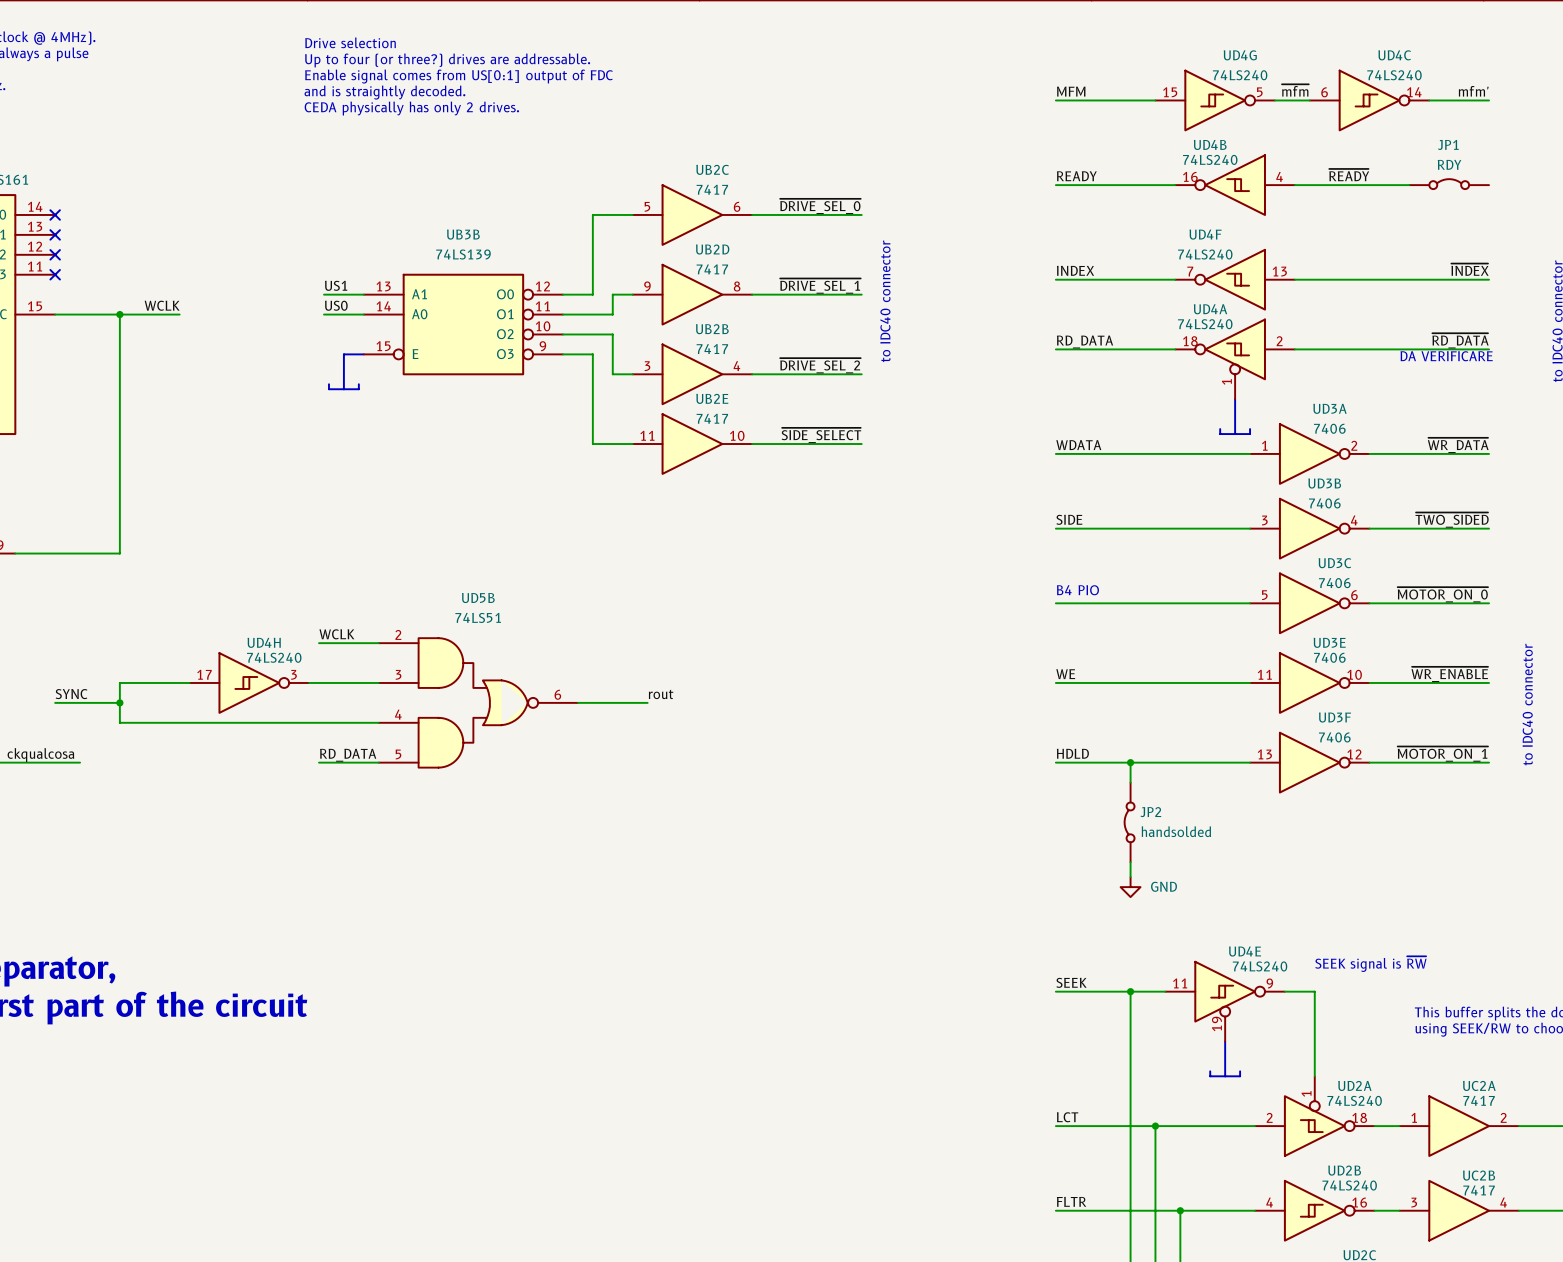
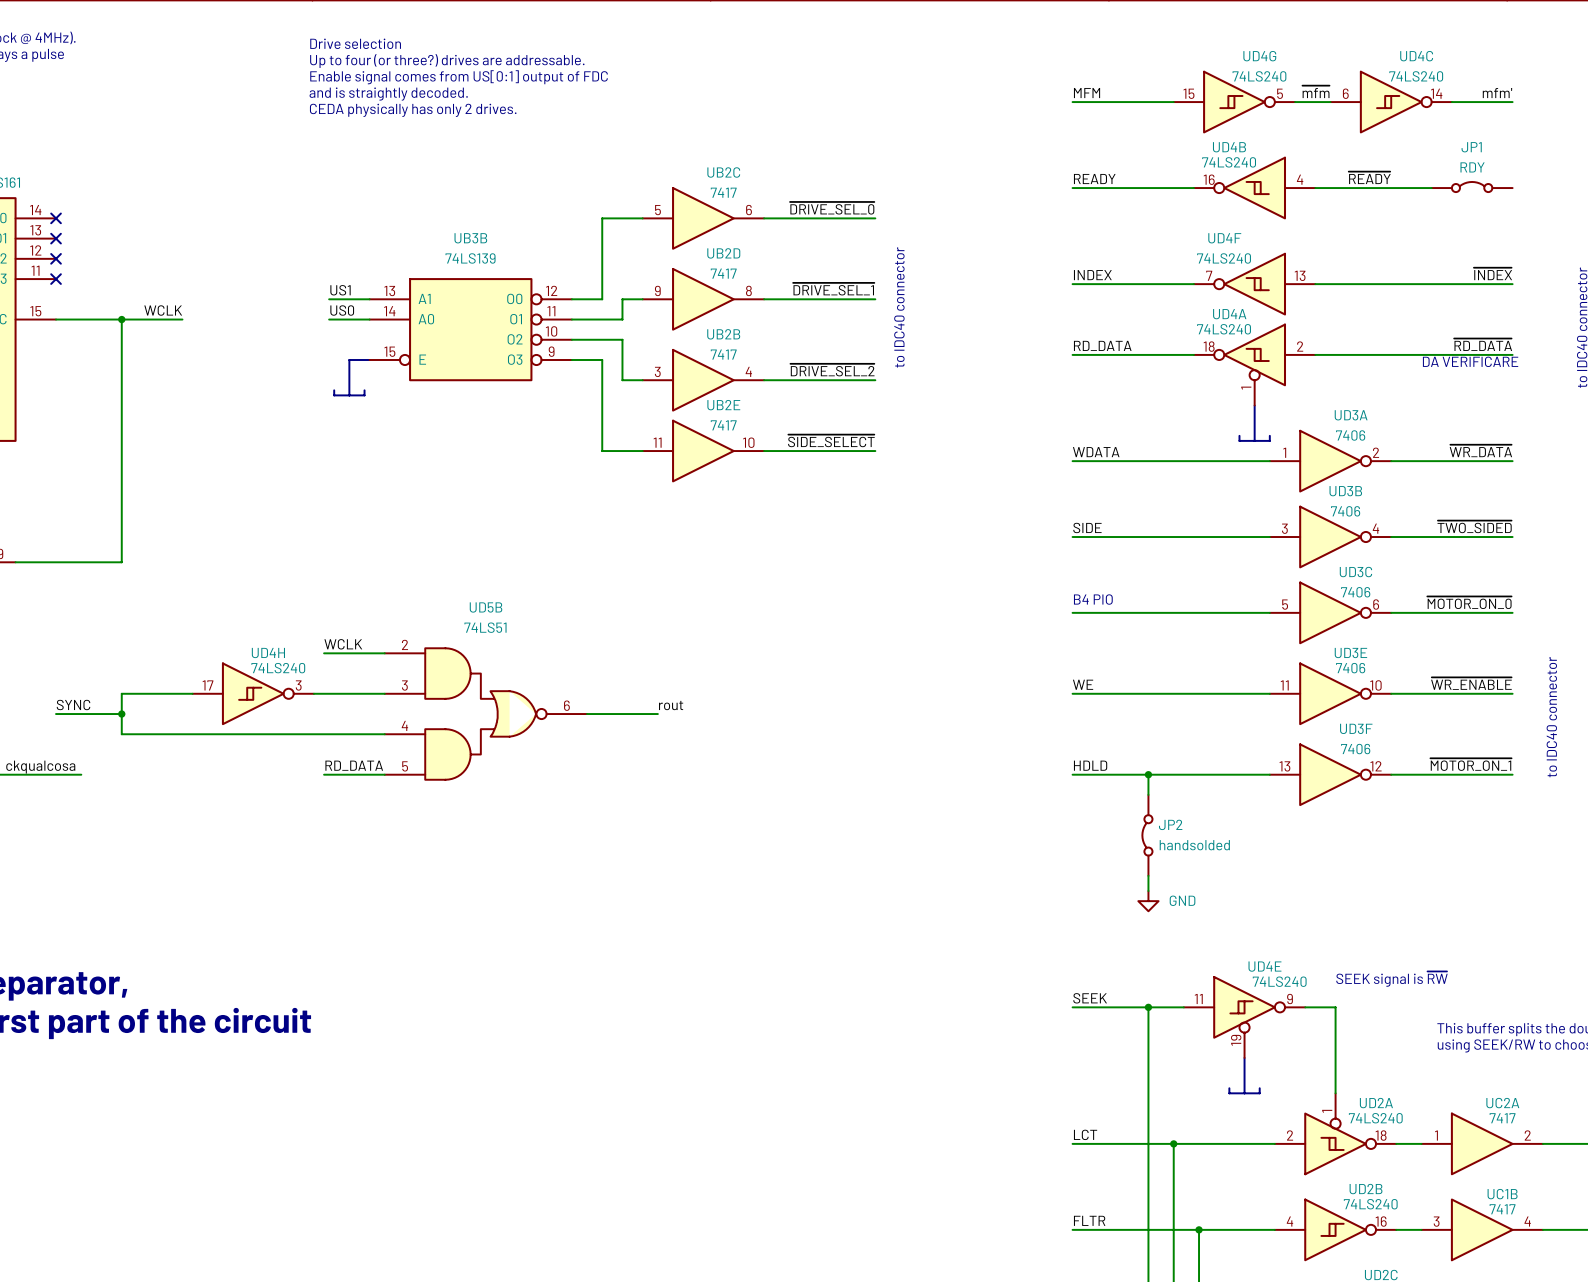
UC2B name: UC2B (1479, 1175) -> UC1B (1502, 1194)

